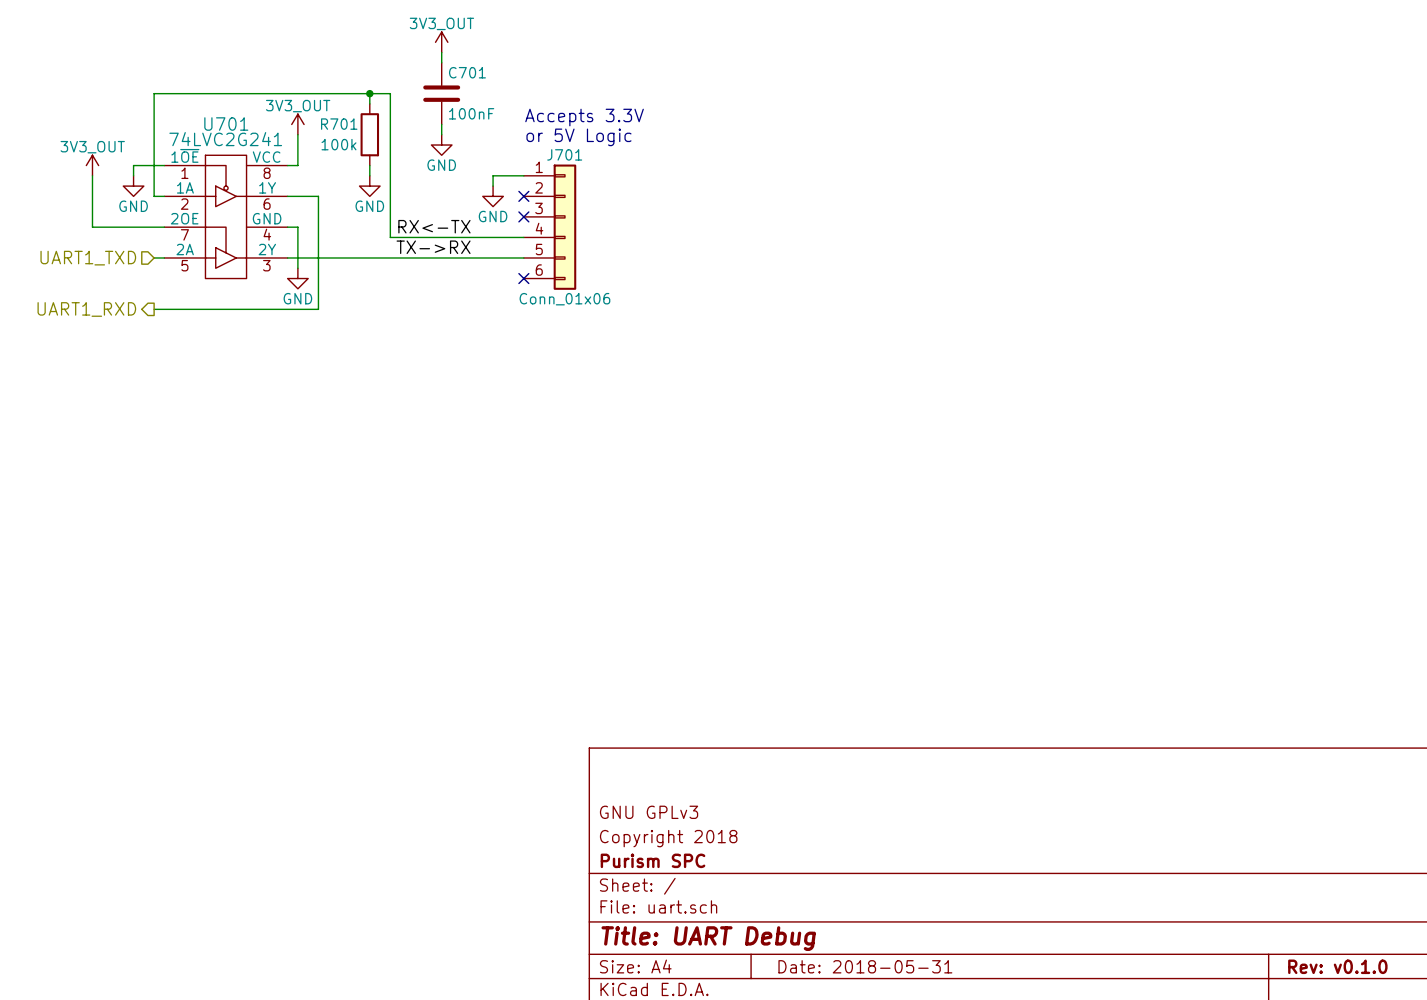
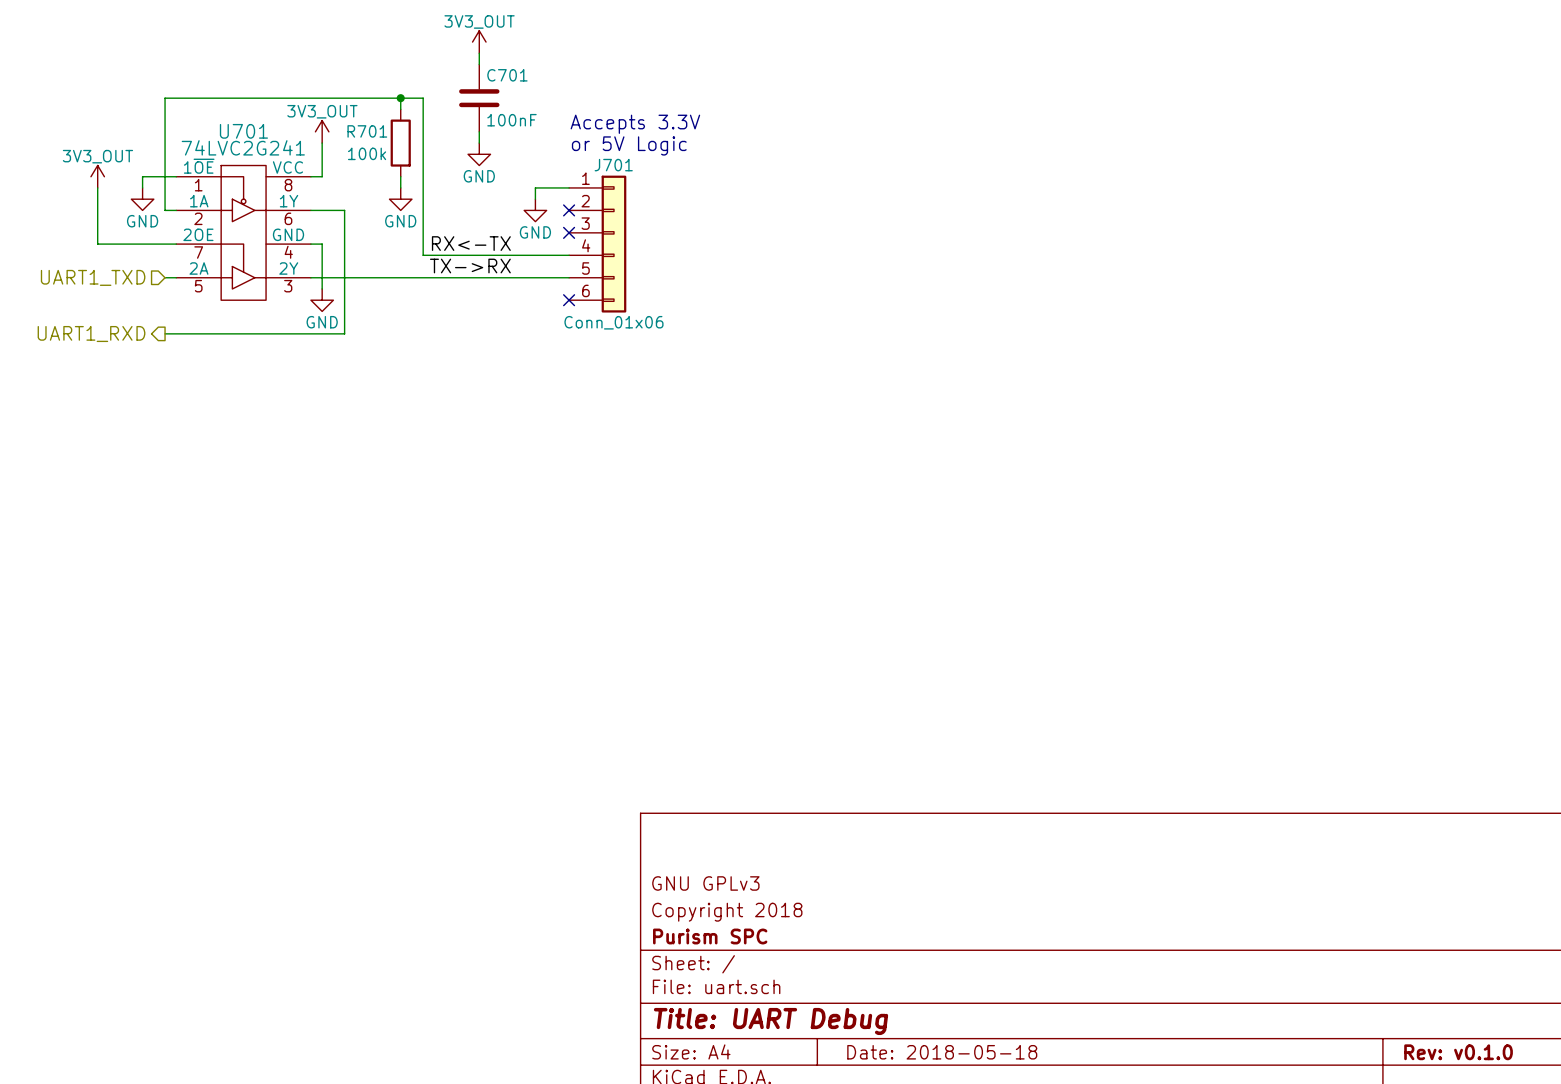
title block: Date: 2018-05-31 (865, 966) -> Date: 2018-05-18 (942, 1052)

